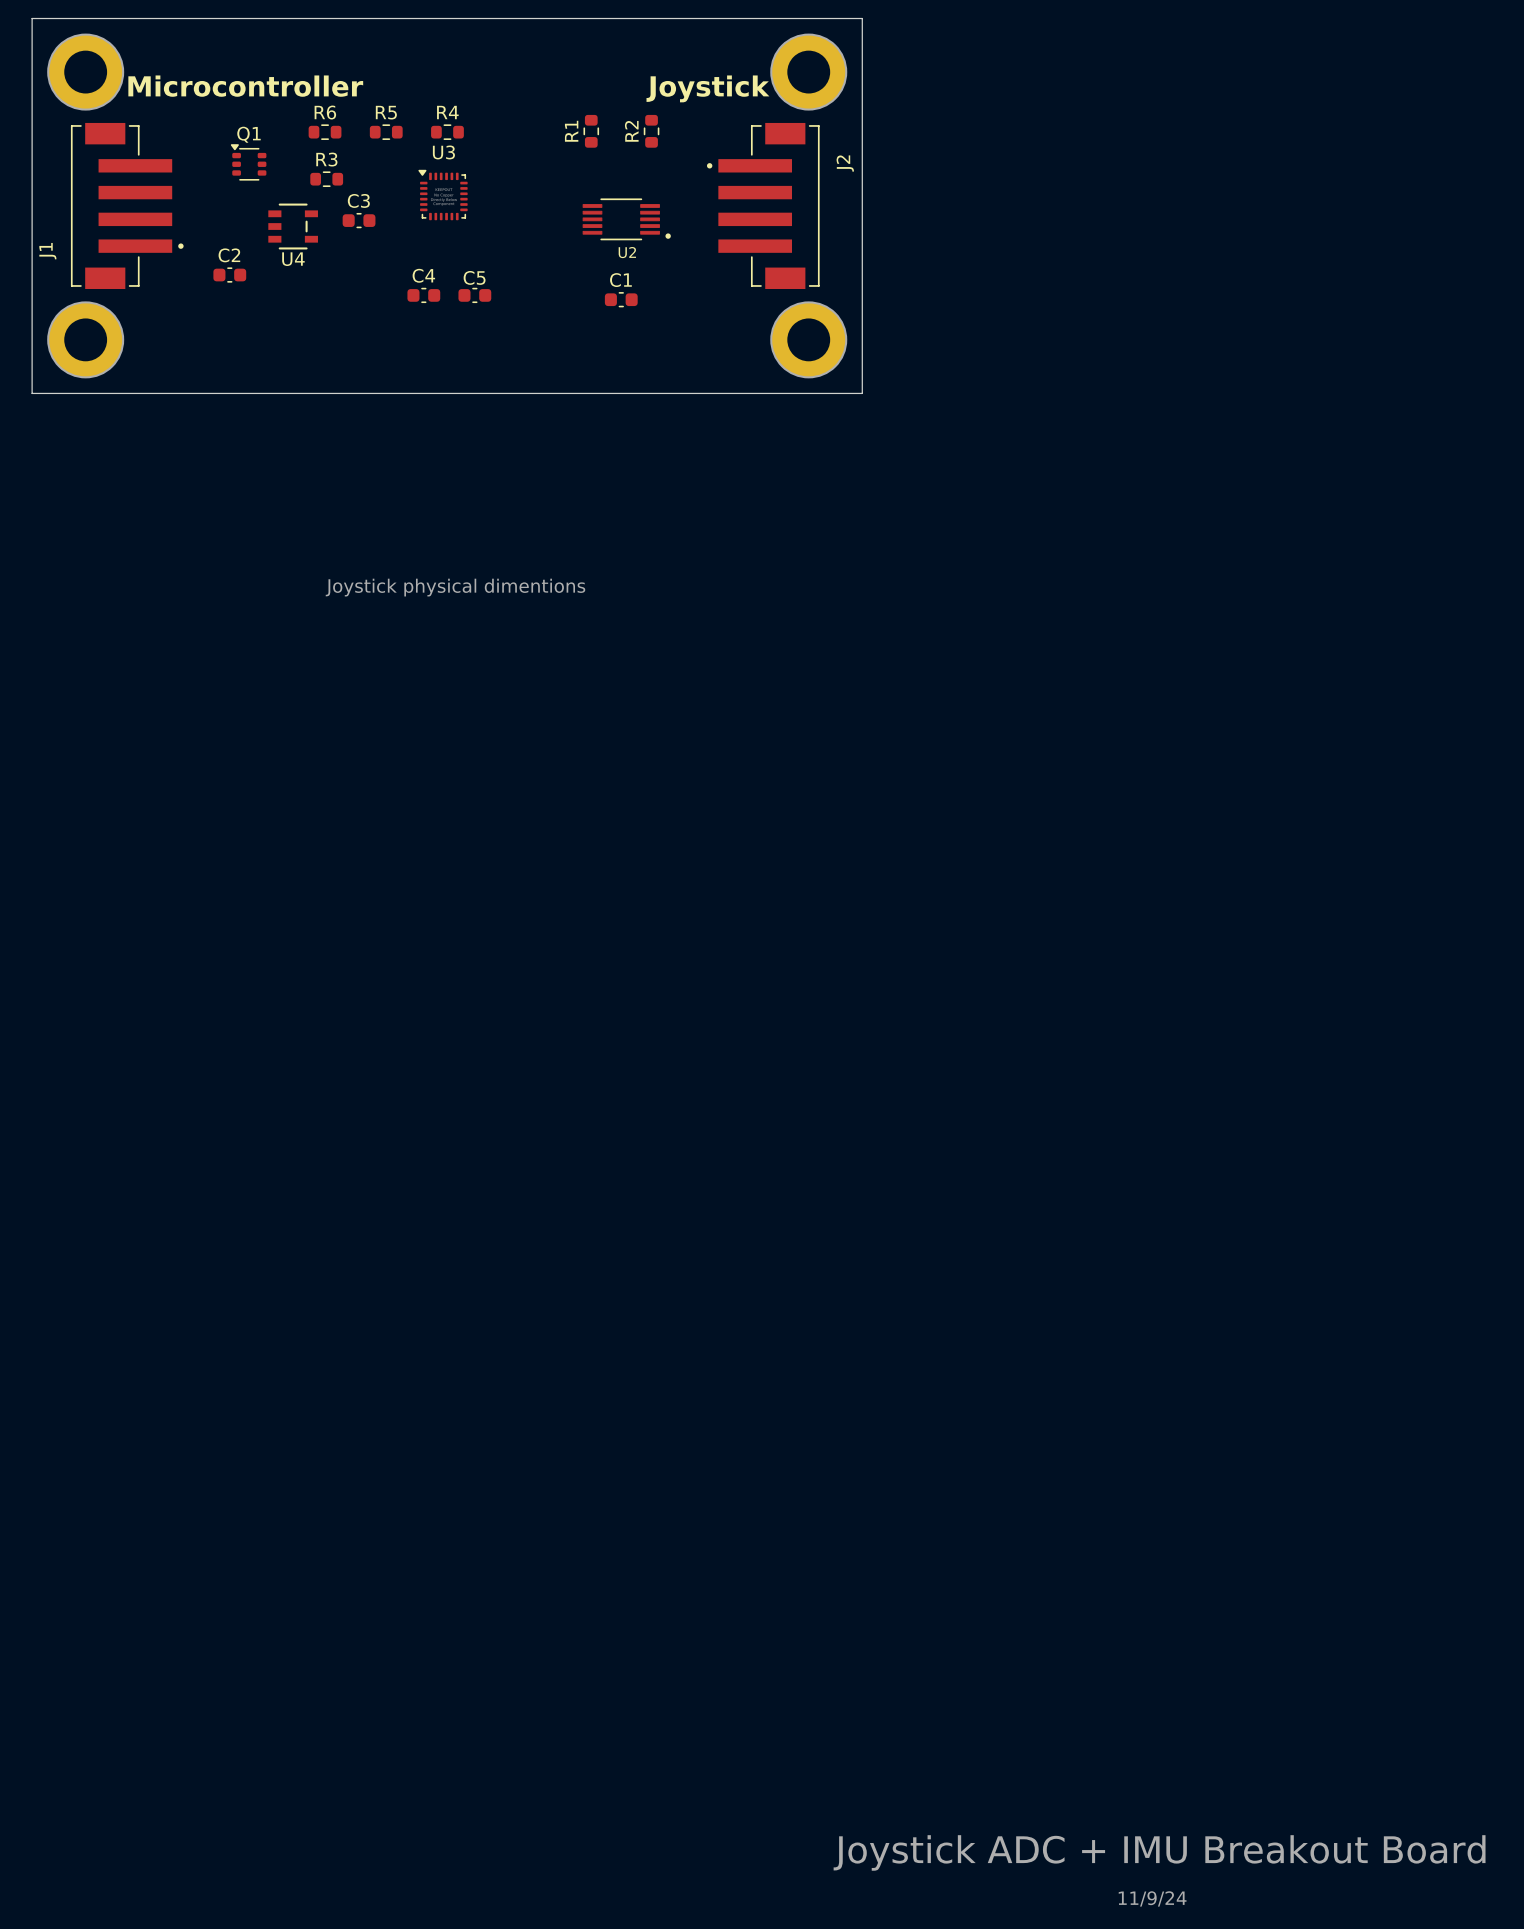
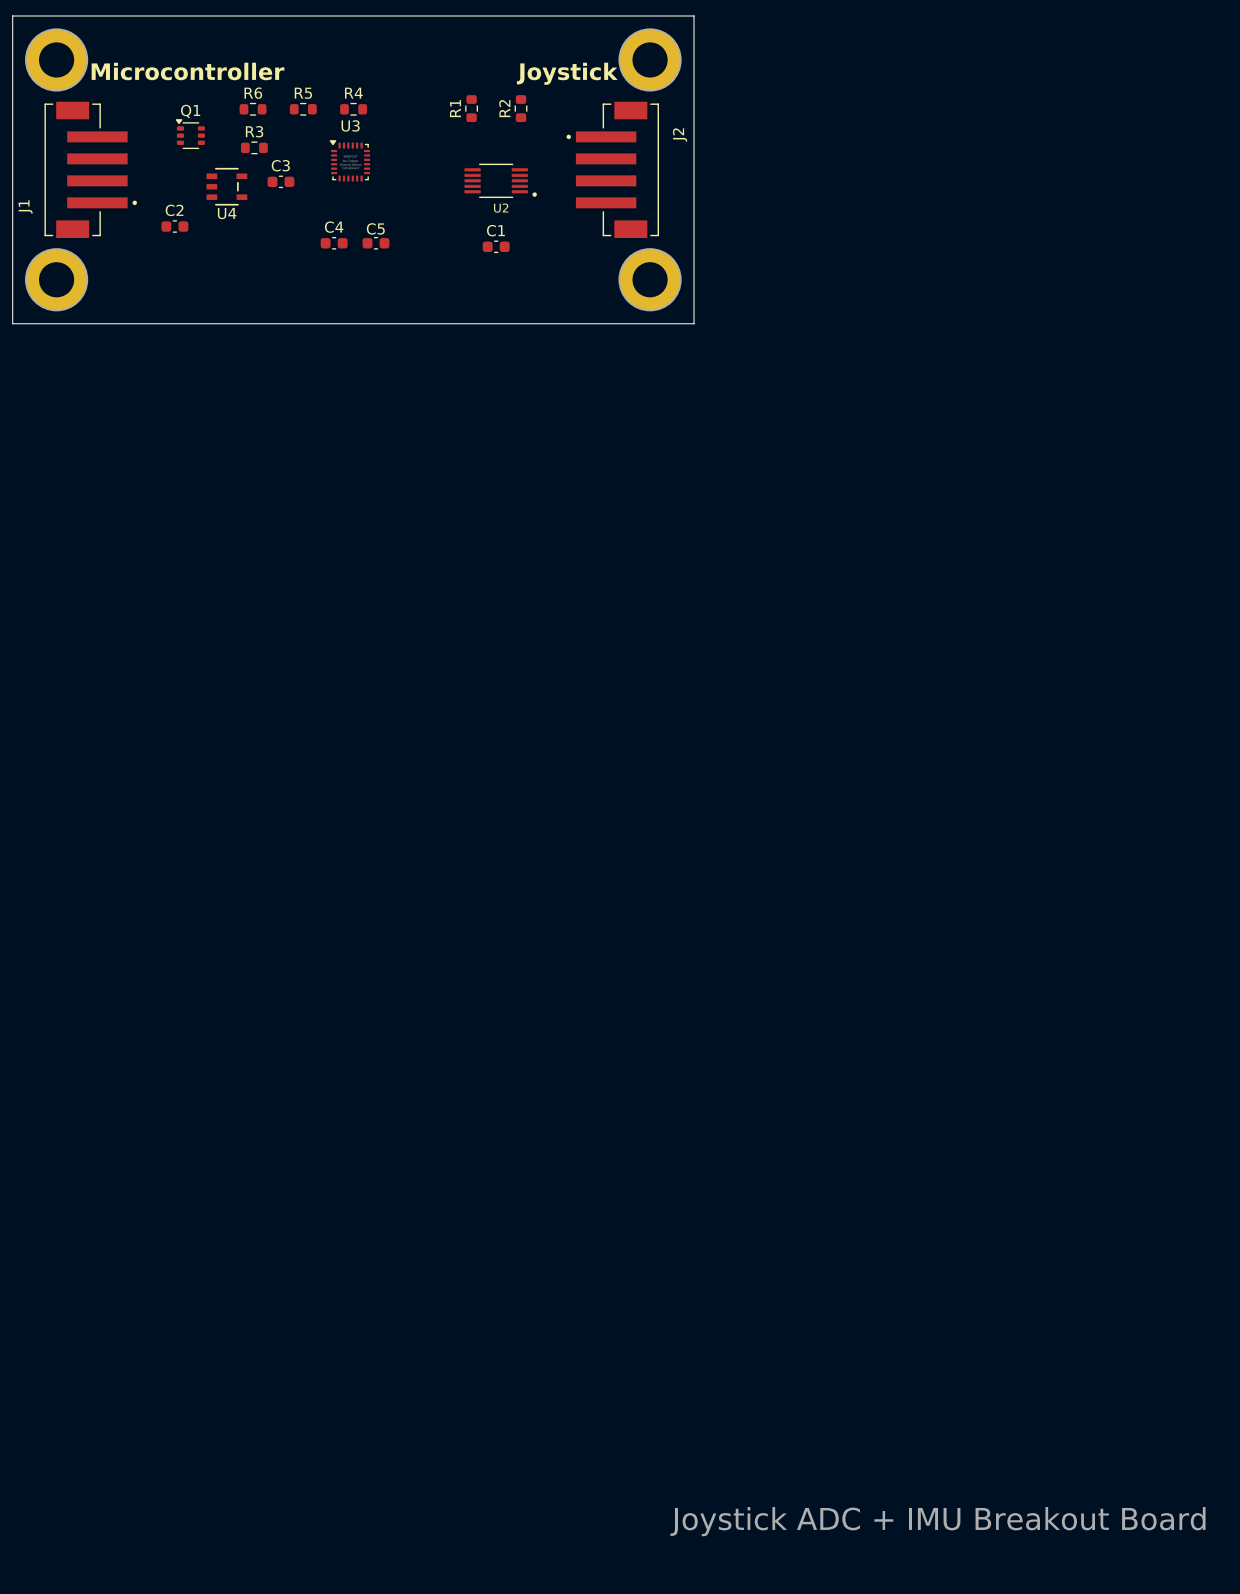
text: Joystick physical dimentions (455, 587) -> none
text: 11/9/24 (1152, 1898) -> none

